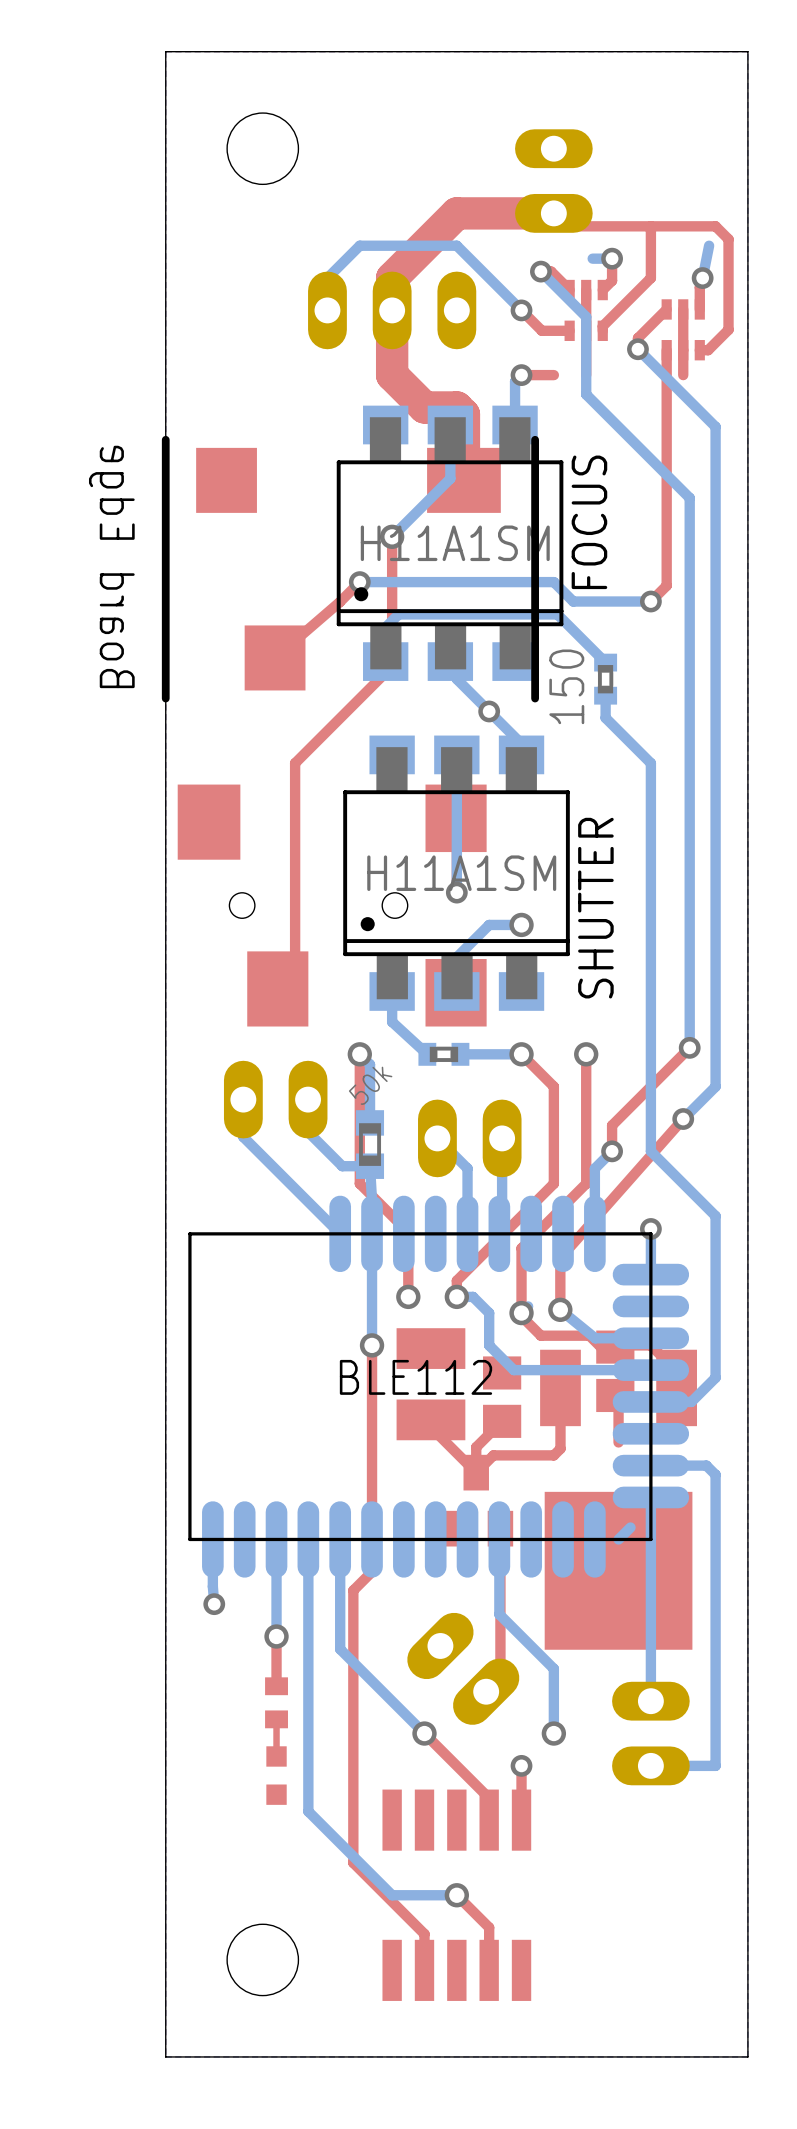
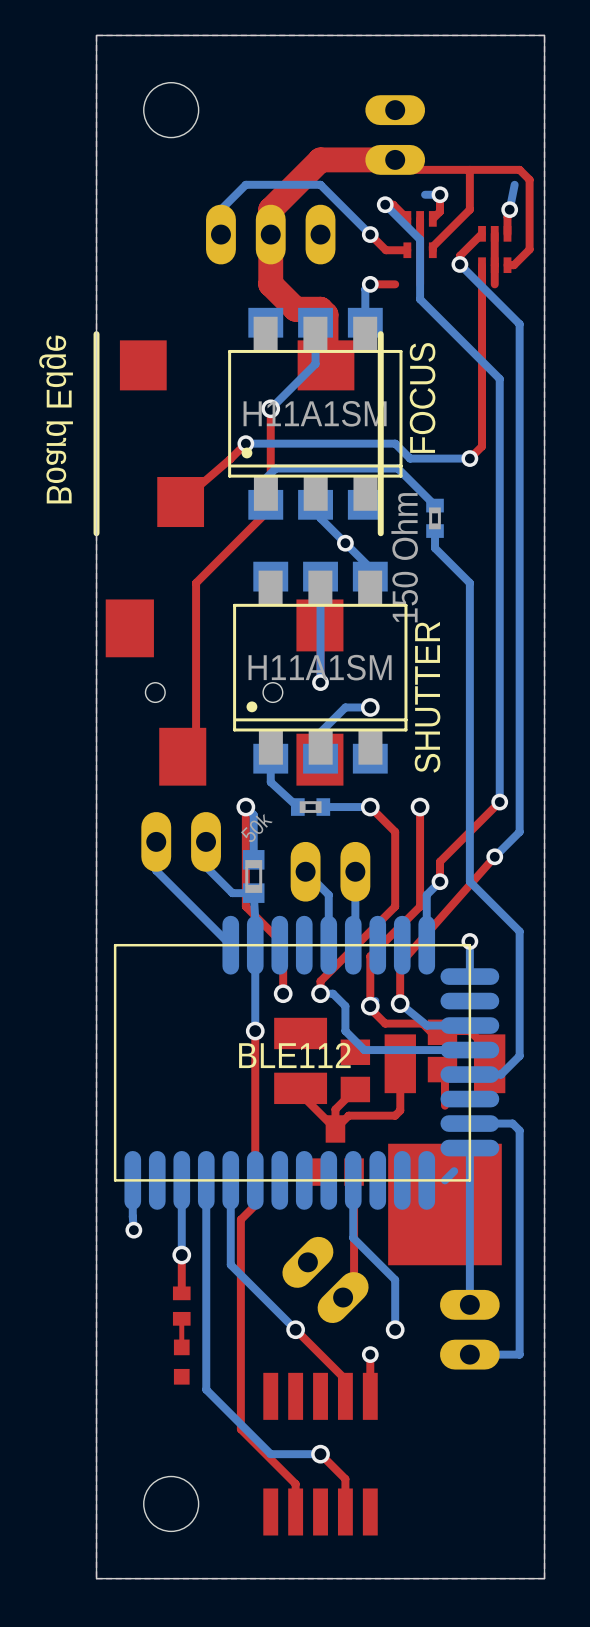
part value: 150 (566, 686) -> 150 Ohm (404, 557)

